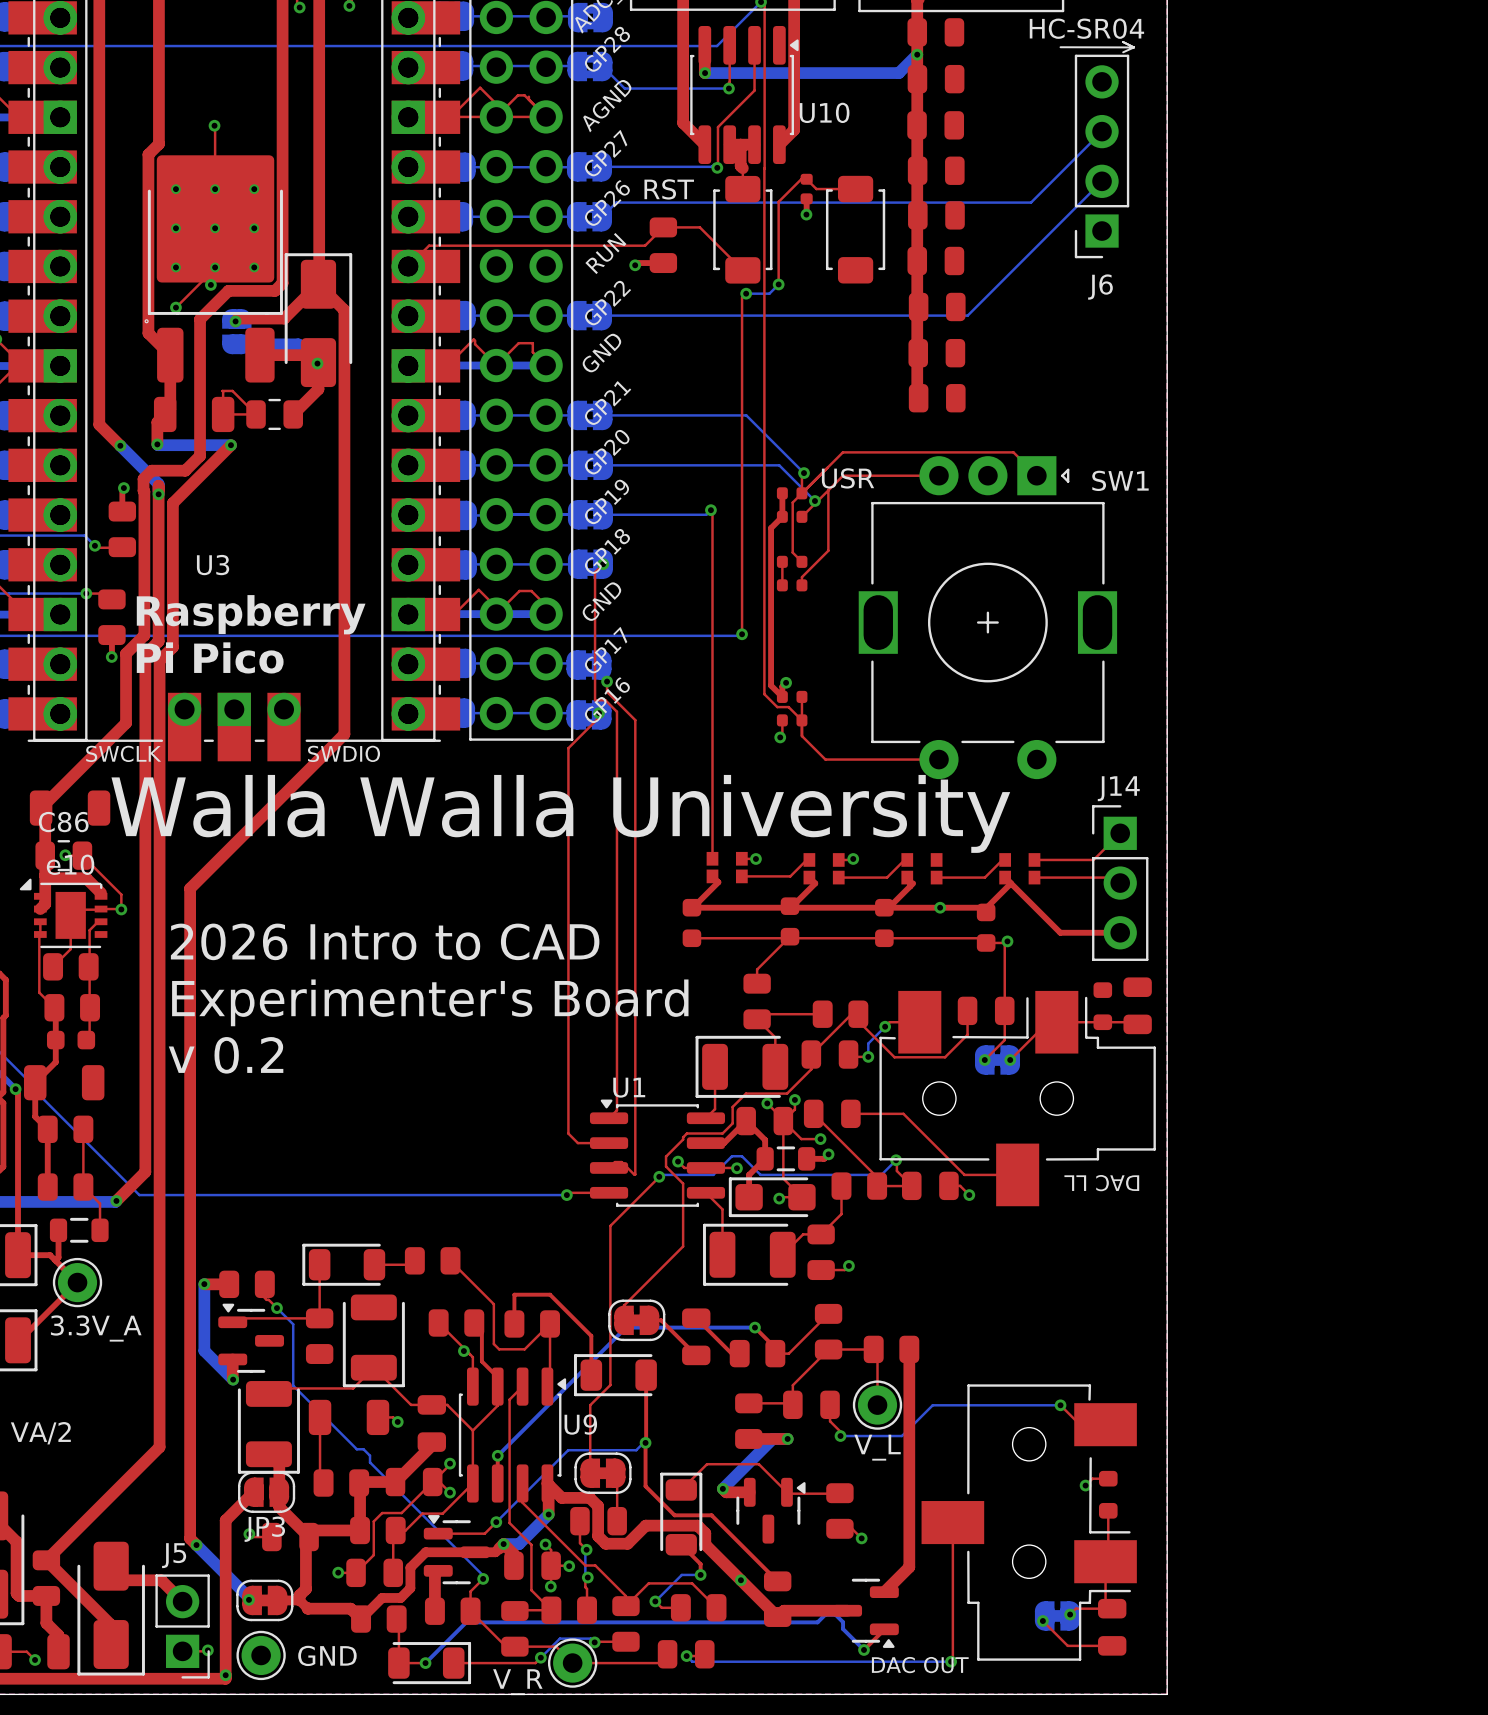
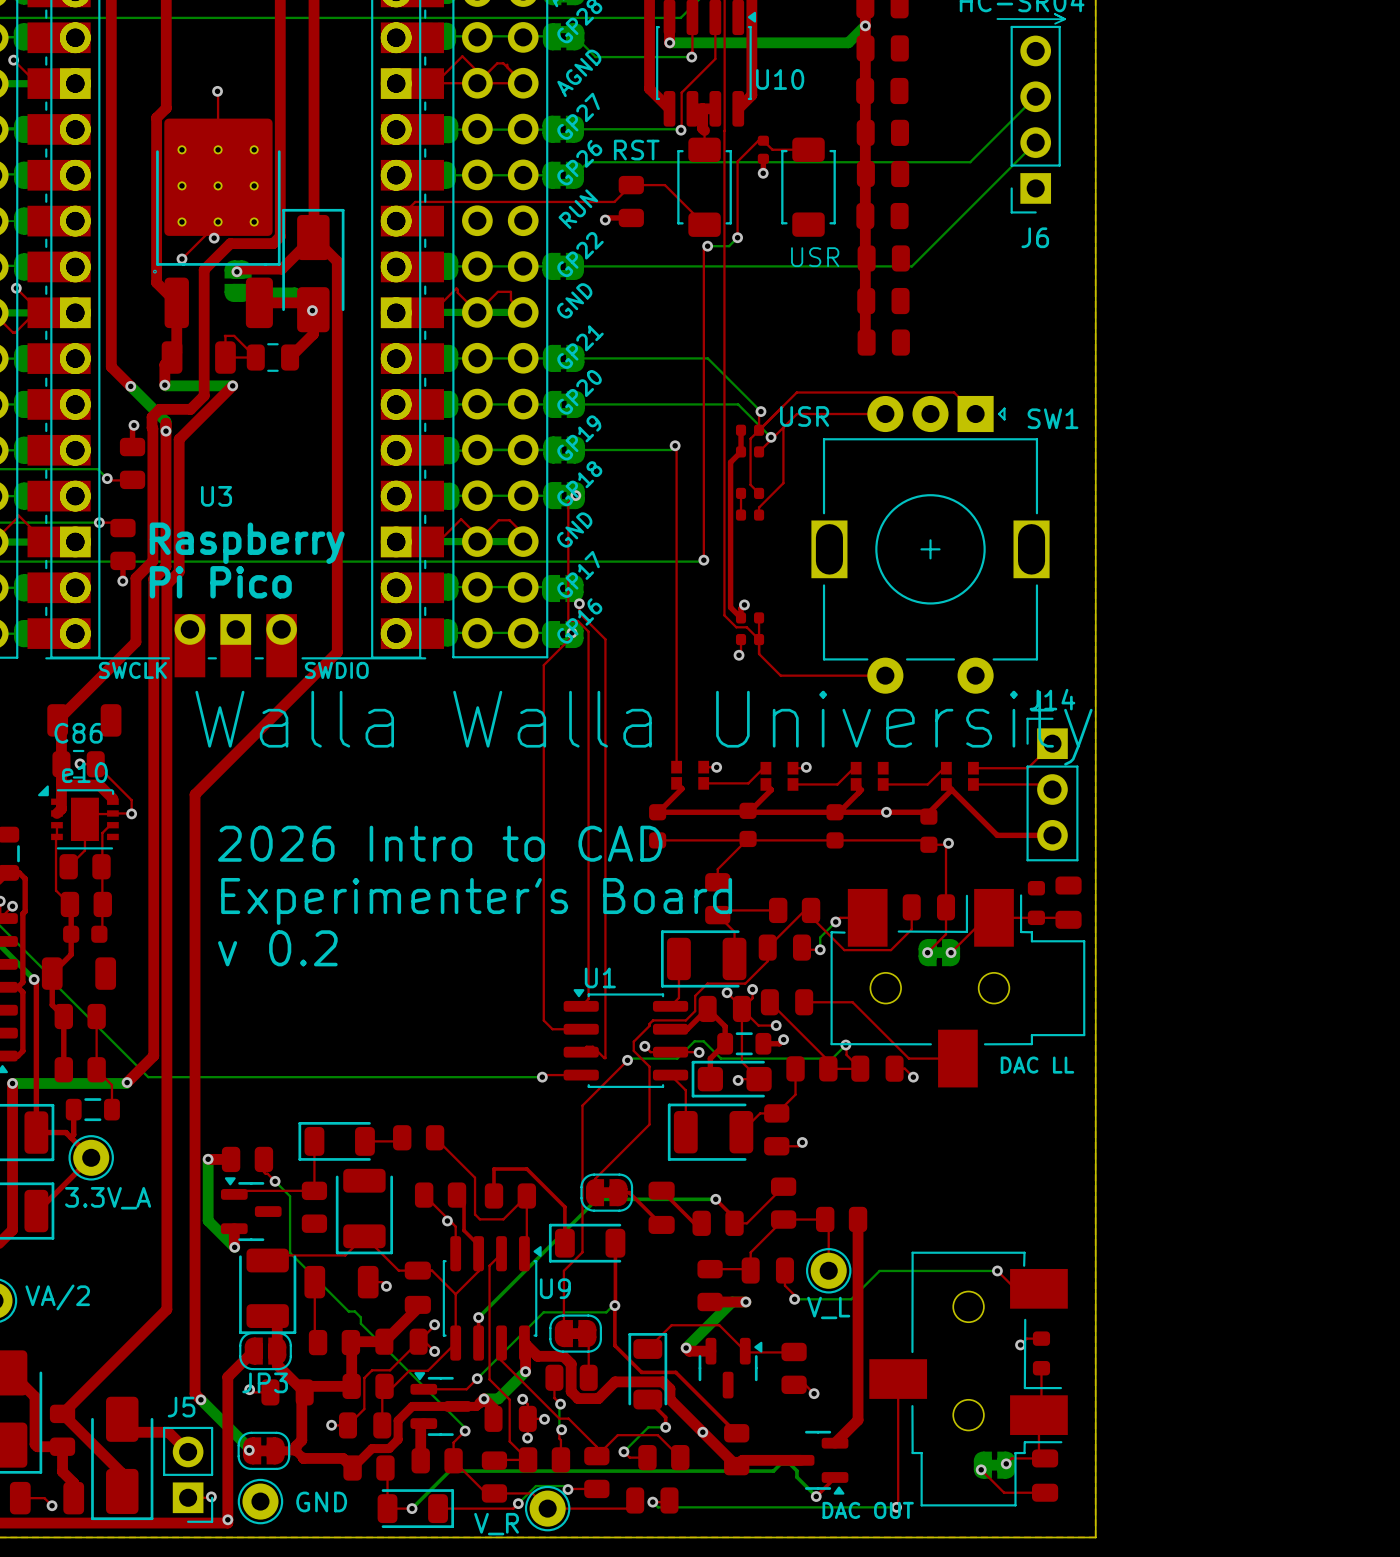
part text: none -> USR (815, 257)
text position: Walla Walla University (560, 813) -> Walla Walla University (643, 728)
text position: 2026 Intro to CAD (385, 941) -> 2026 Intro to CAD (440, 843)
text position: Experimenter's Board (430, 1002) -> Experimenter's Board (476, 901)
text position: v 0.2 (226, 1055) -> v 0.2 (277, 948)
part text rotation: 0° (1101, 1183) -> 180° (1037, 1065)

